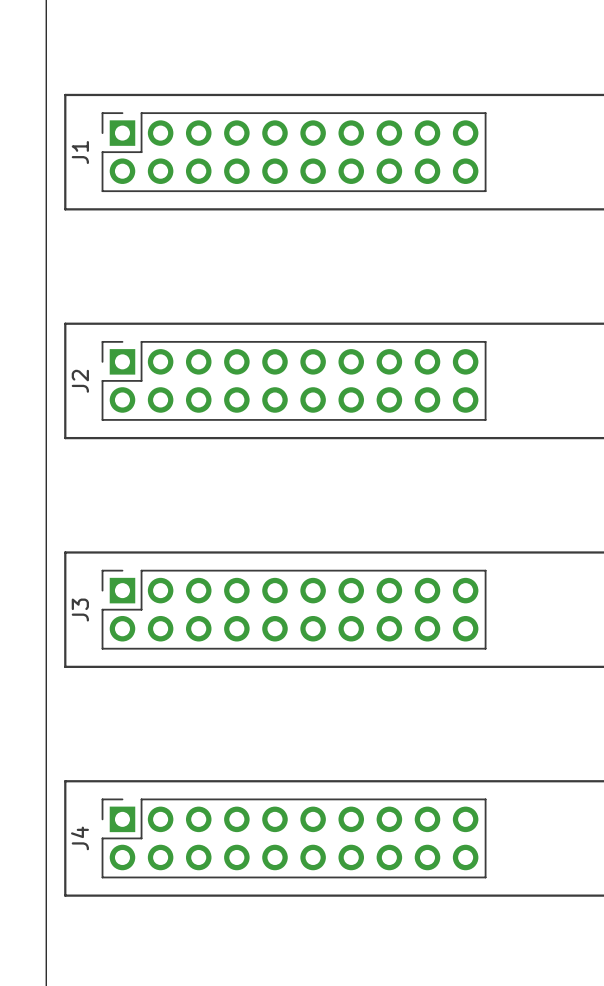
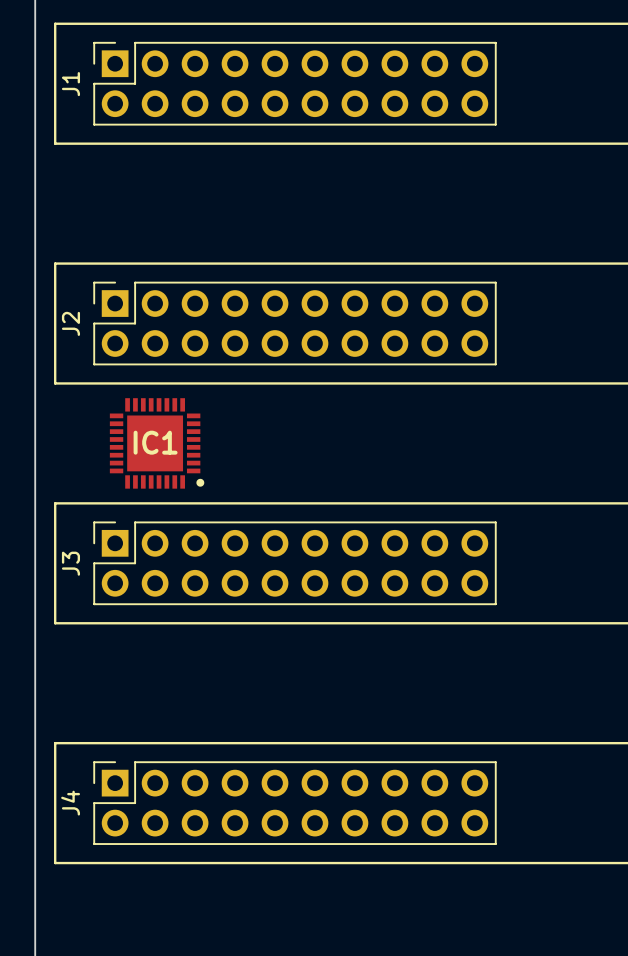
IC1: none -> (157, 443)

